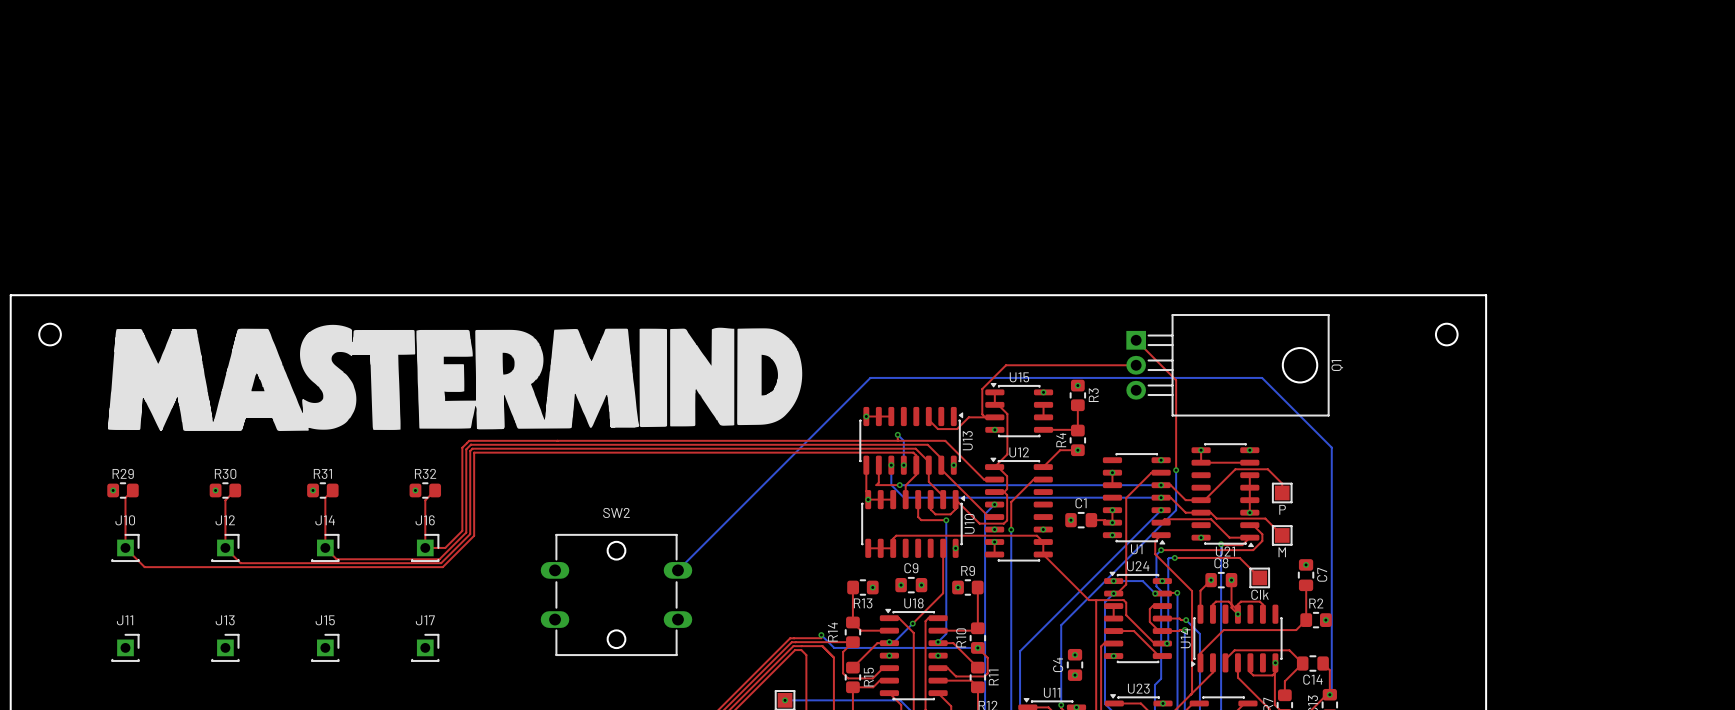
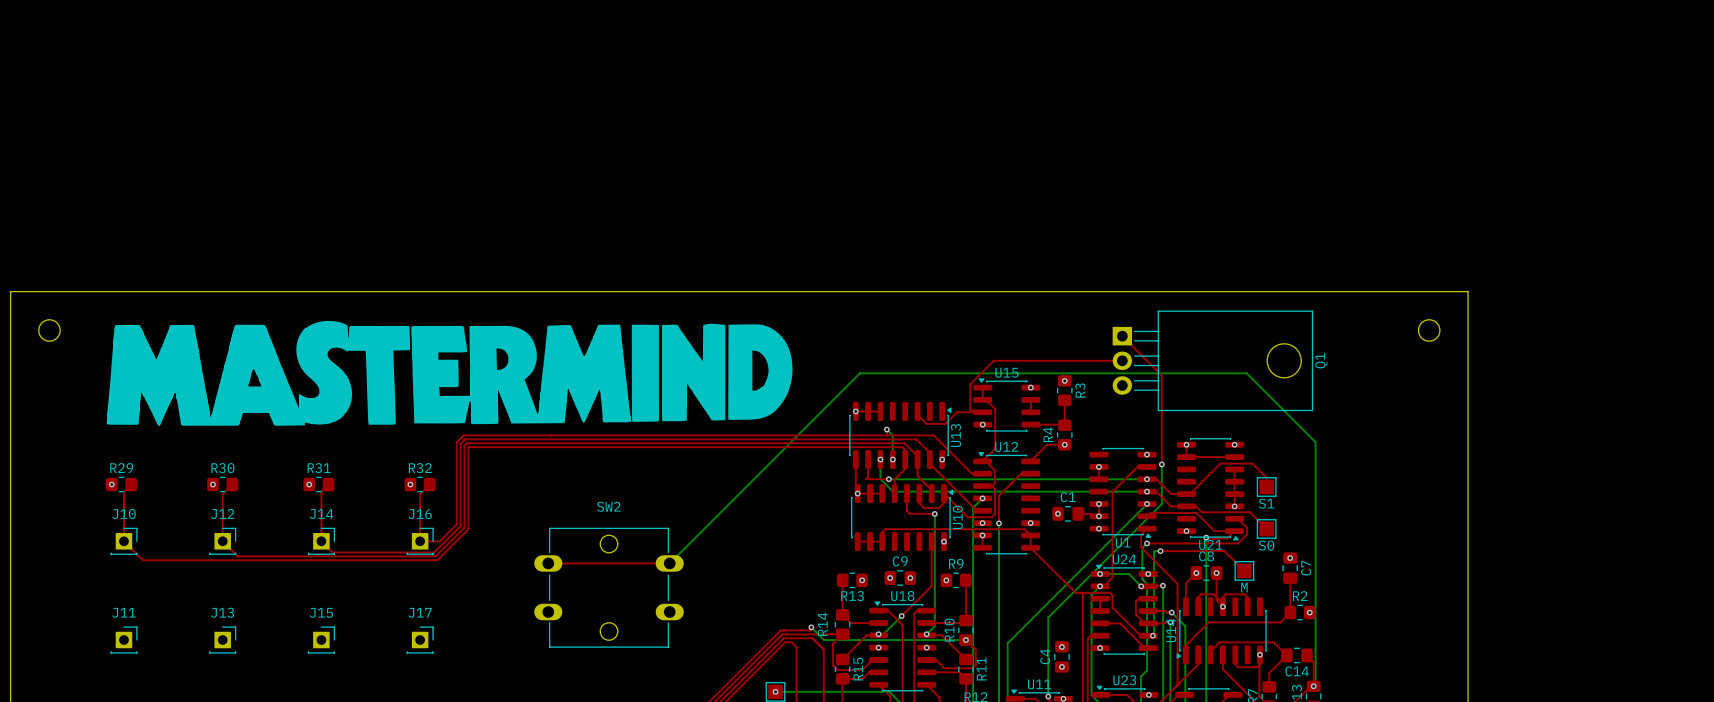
part value: P (1282, 509) -> S1 (1266, 503)
part value: M (1282, 552) -> S0 (1266, 545)
top track: none -> (548, 563) (669, 563)
part value: Clk (1260, 594) -> M (1244, 587)

